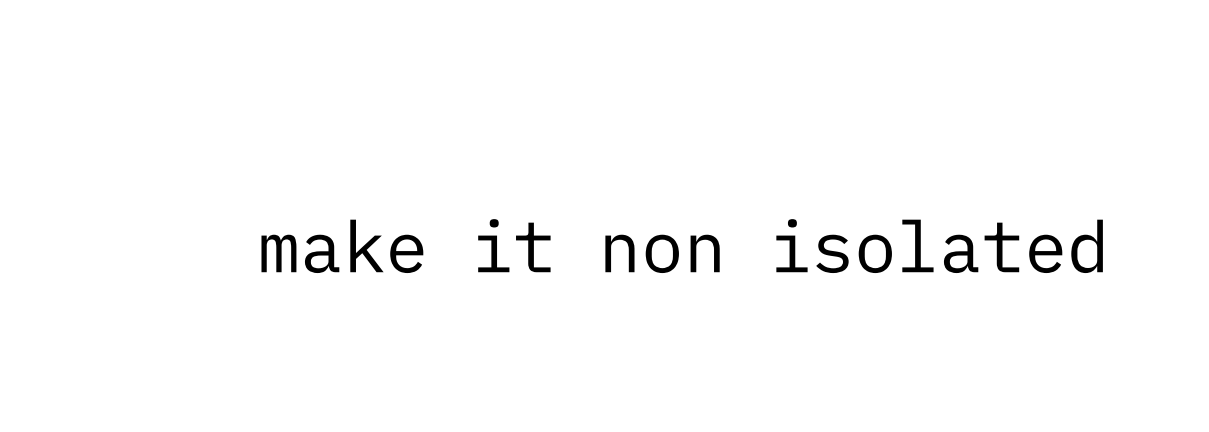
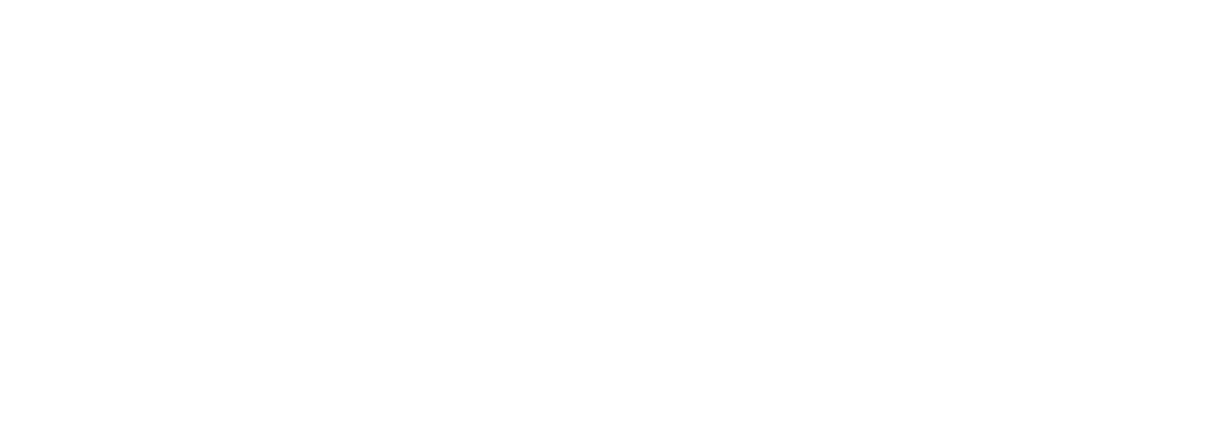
text: make it non isolated (682, 246) -> none

